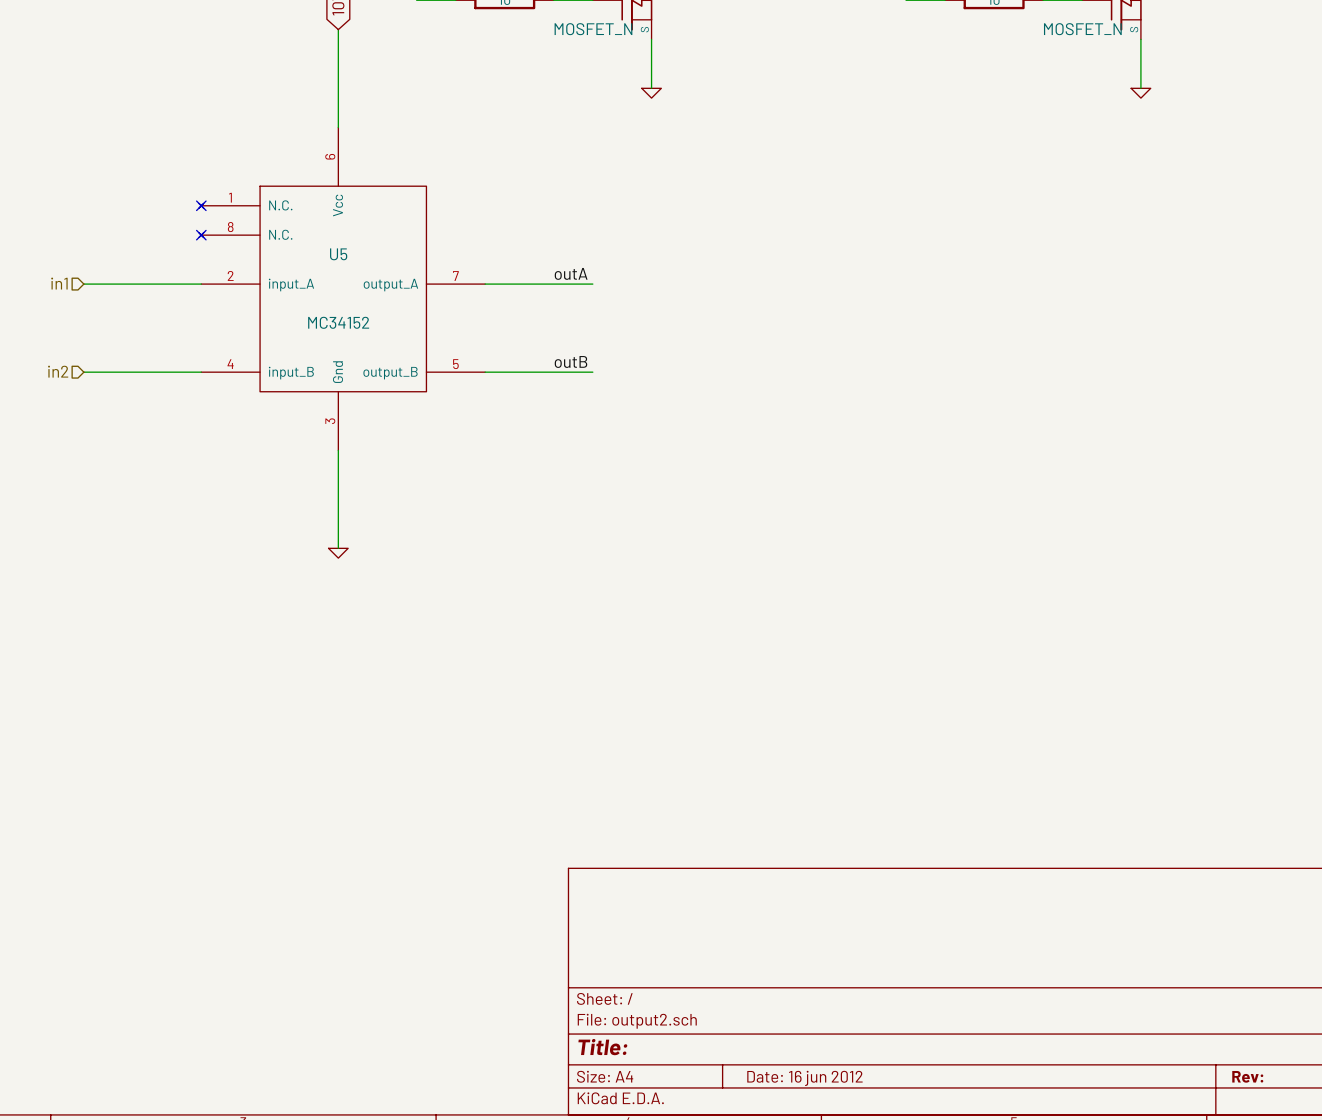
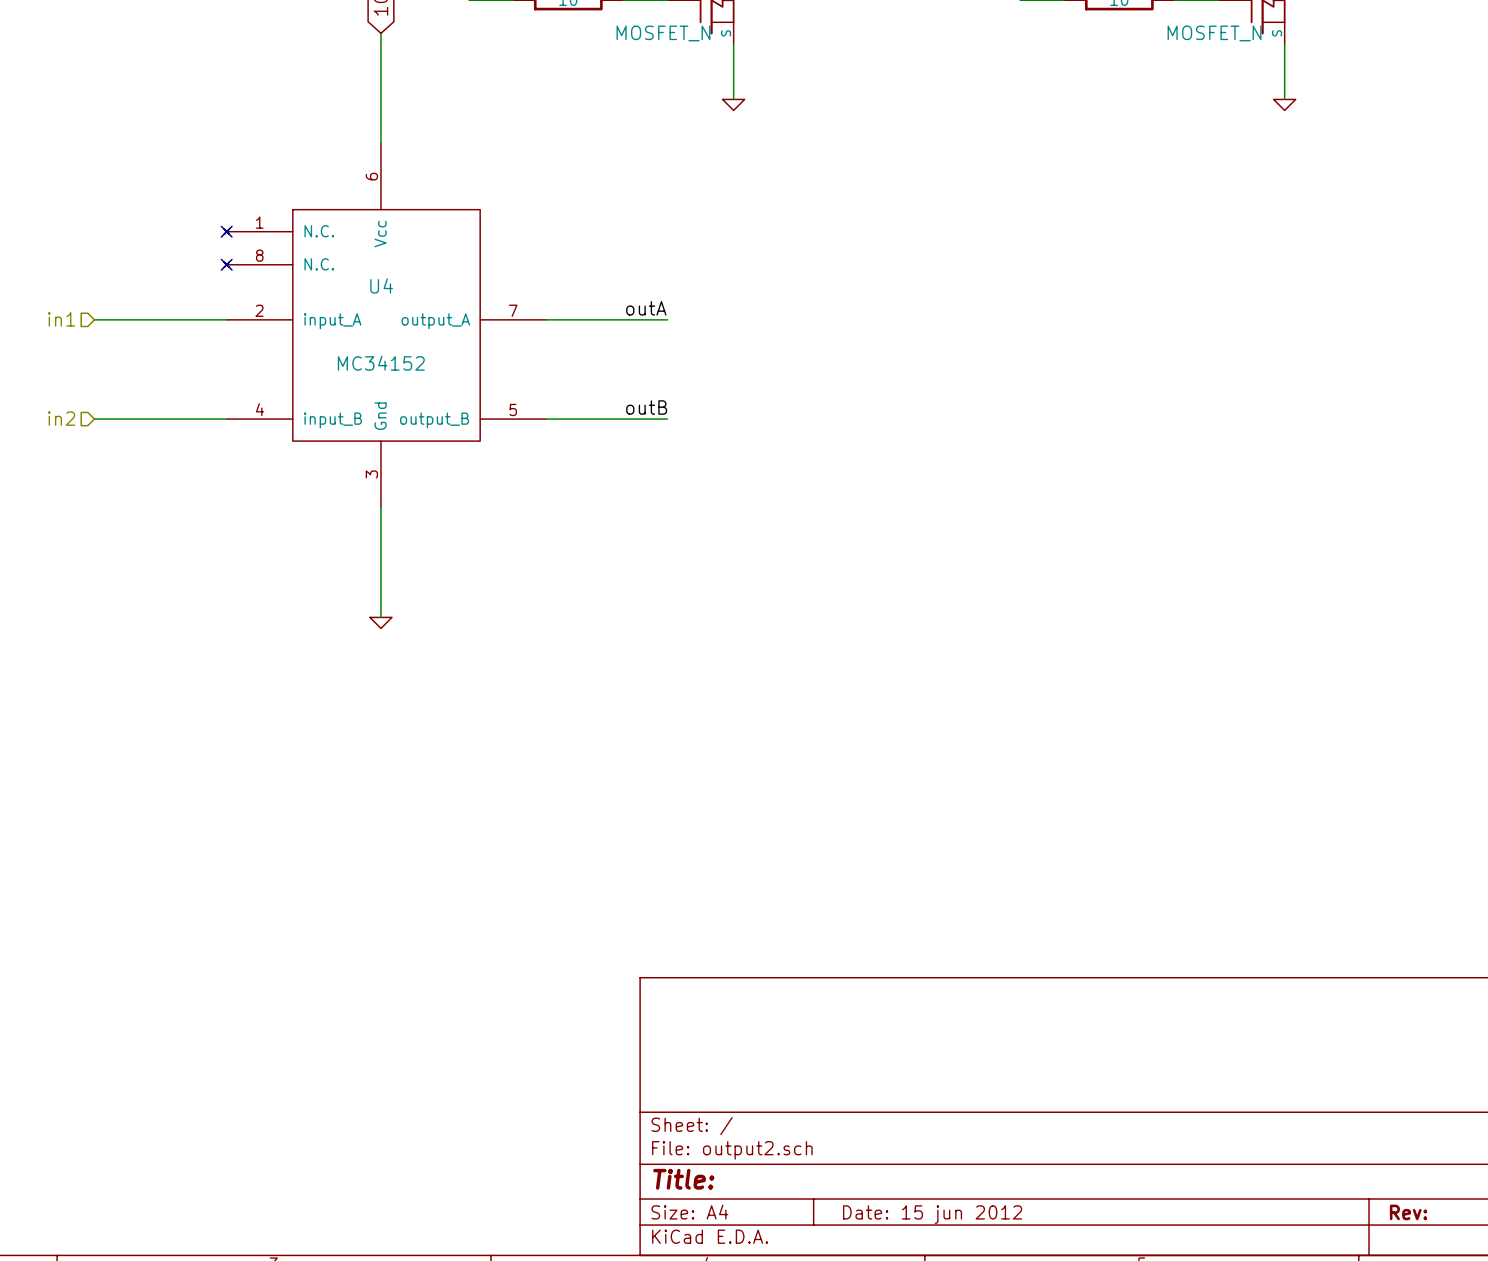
U5 name: U5 (338, 254) -> U4 (381, 285)
title block: Date: 16 jun 2012 (804, 1078) -> Date: 15 jun 2012 (932, 1214)

